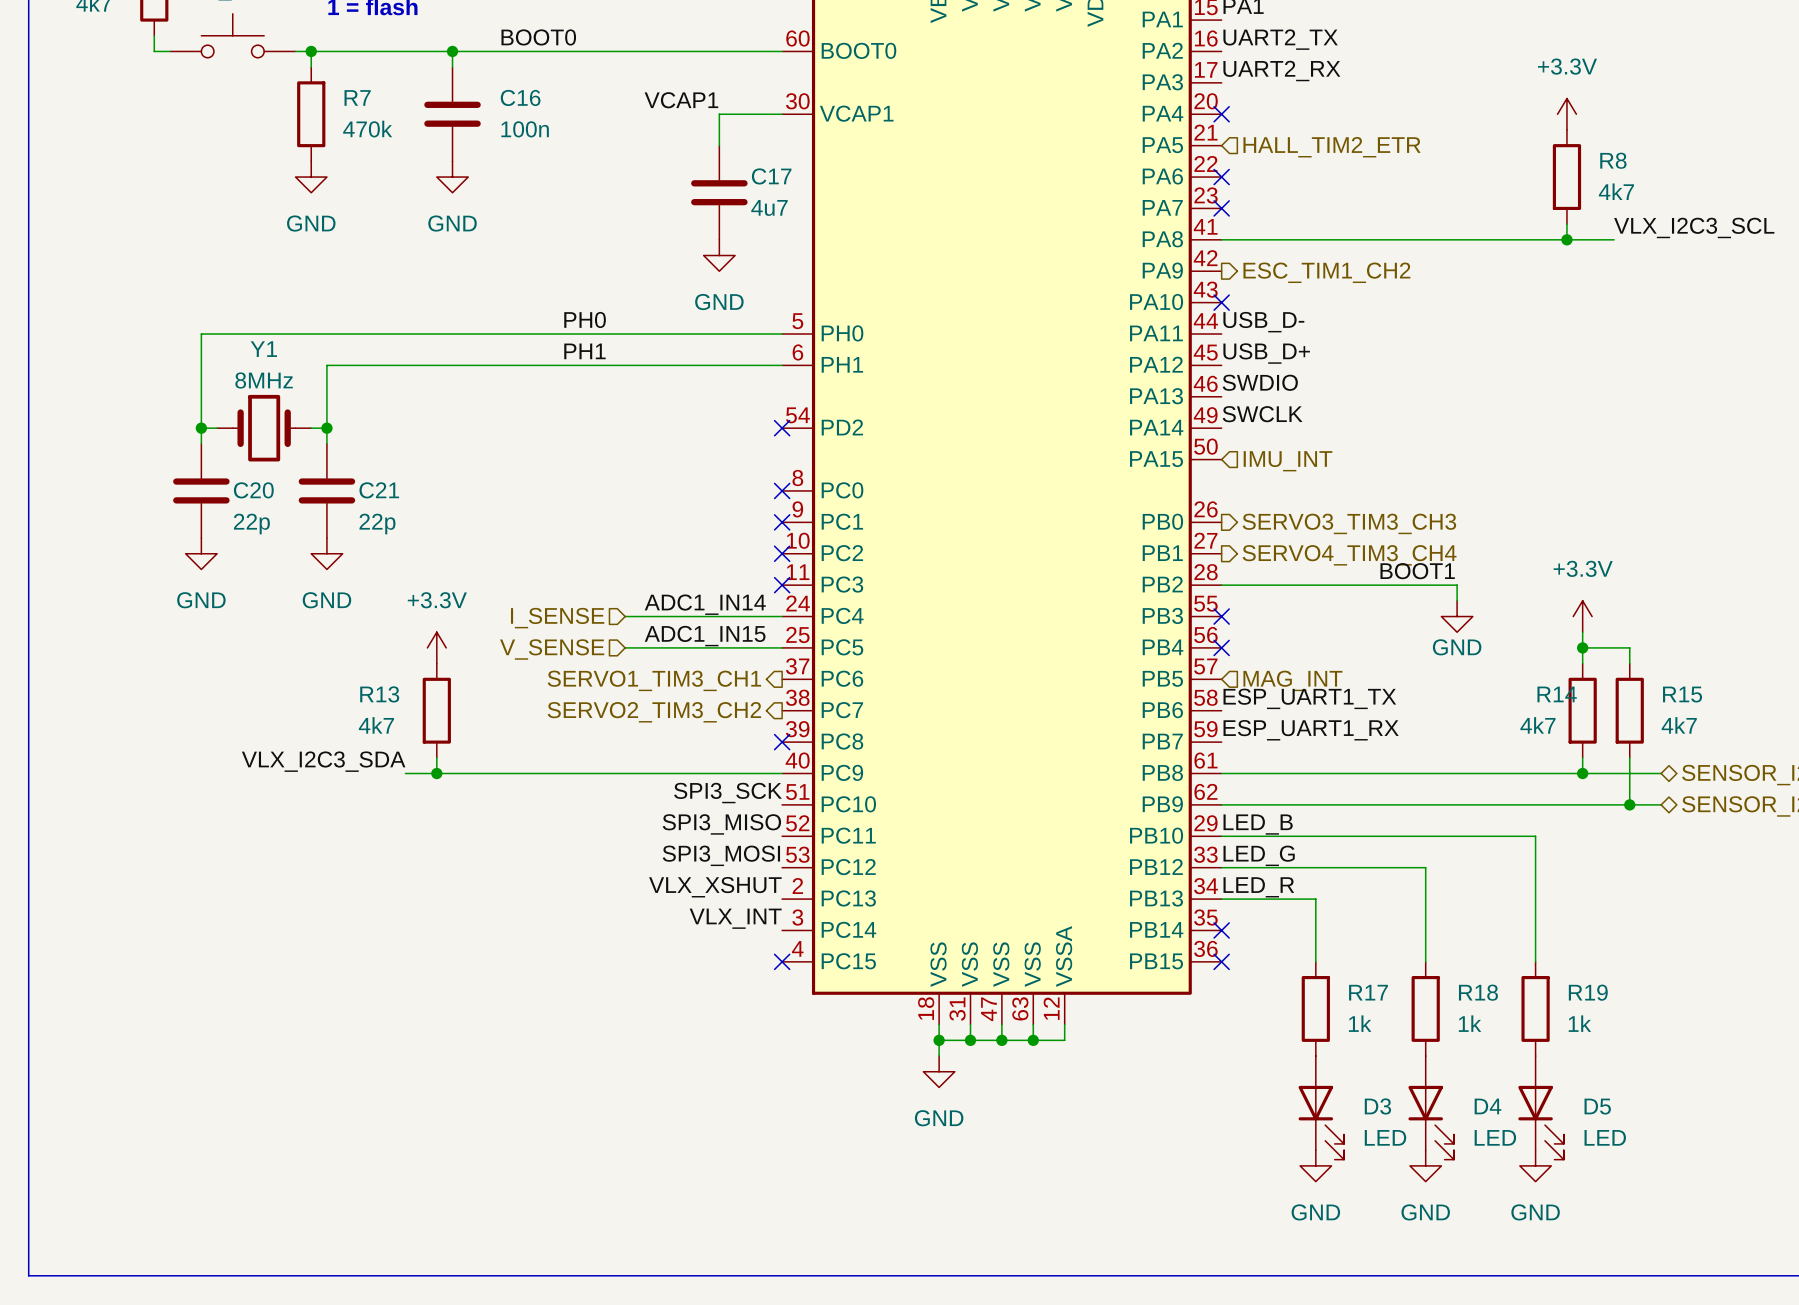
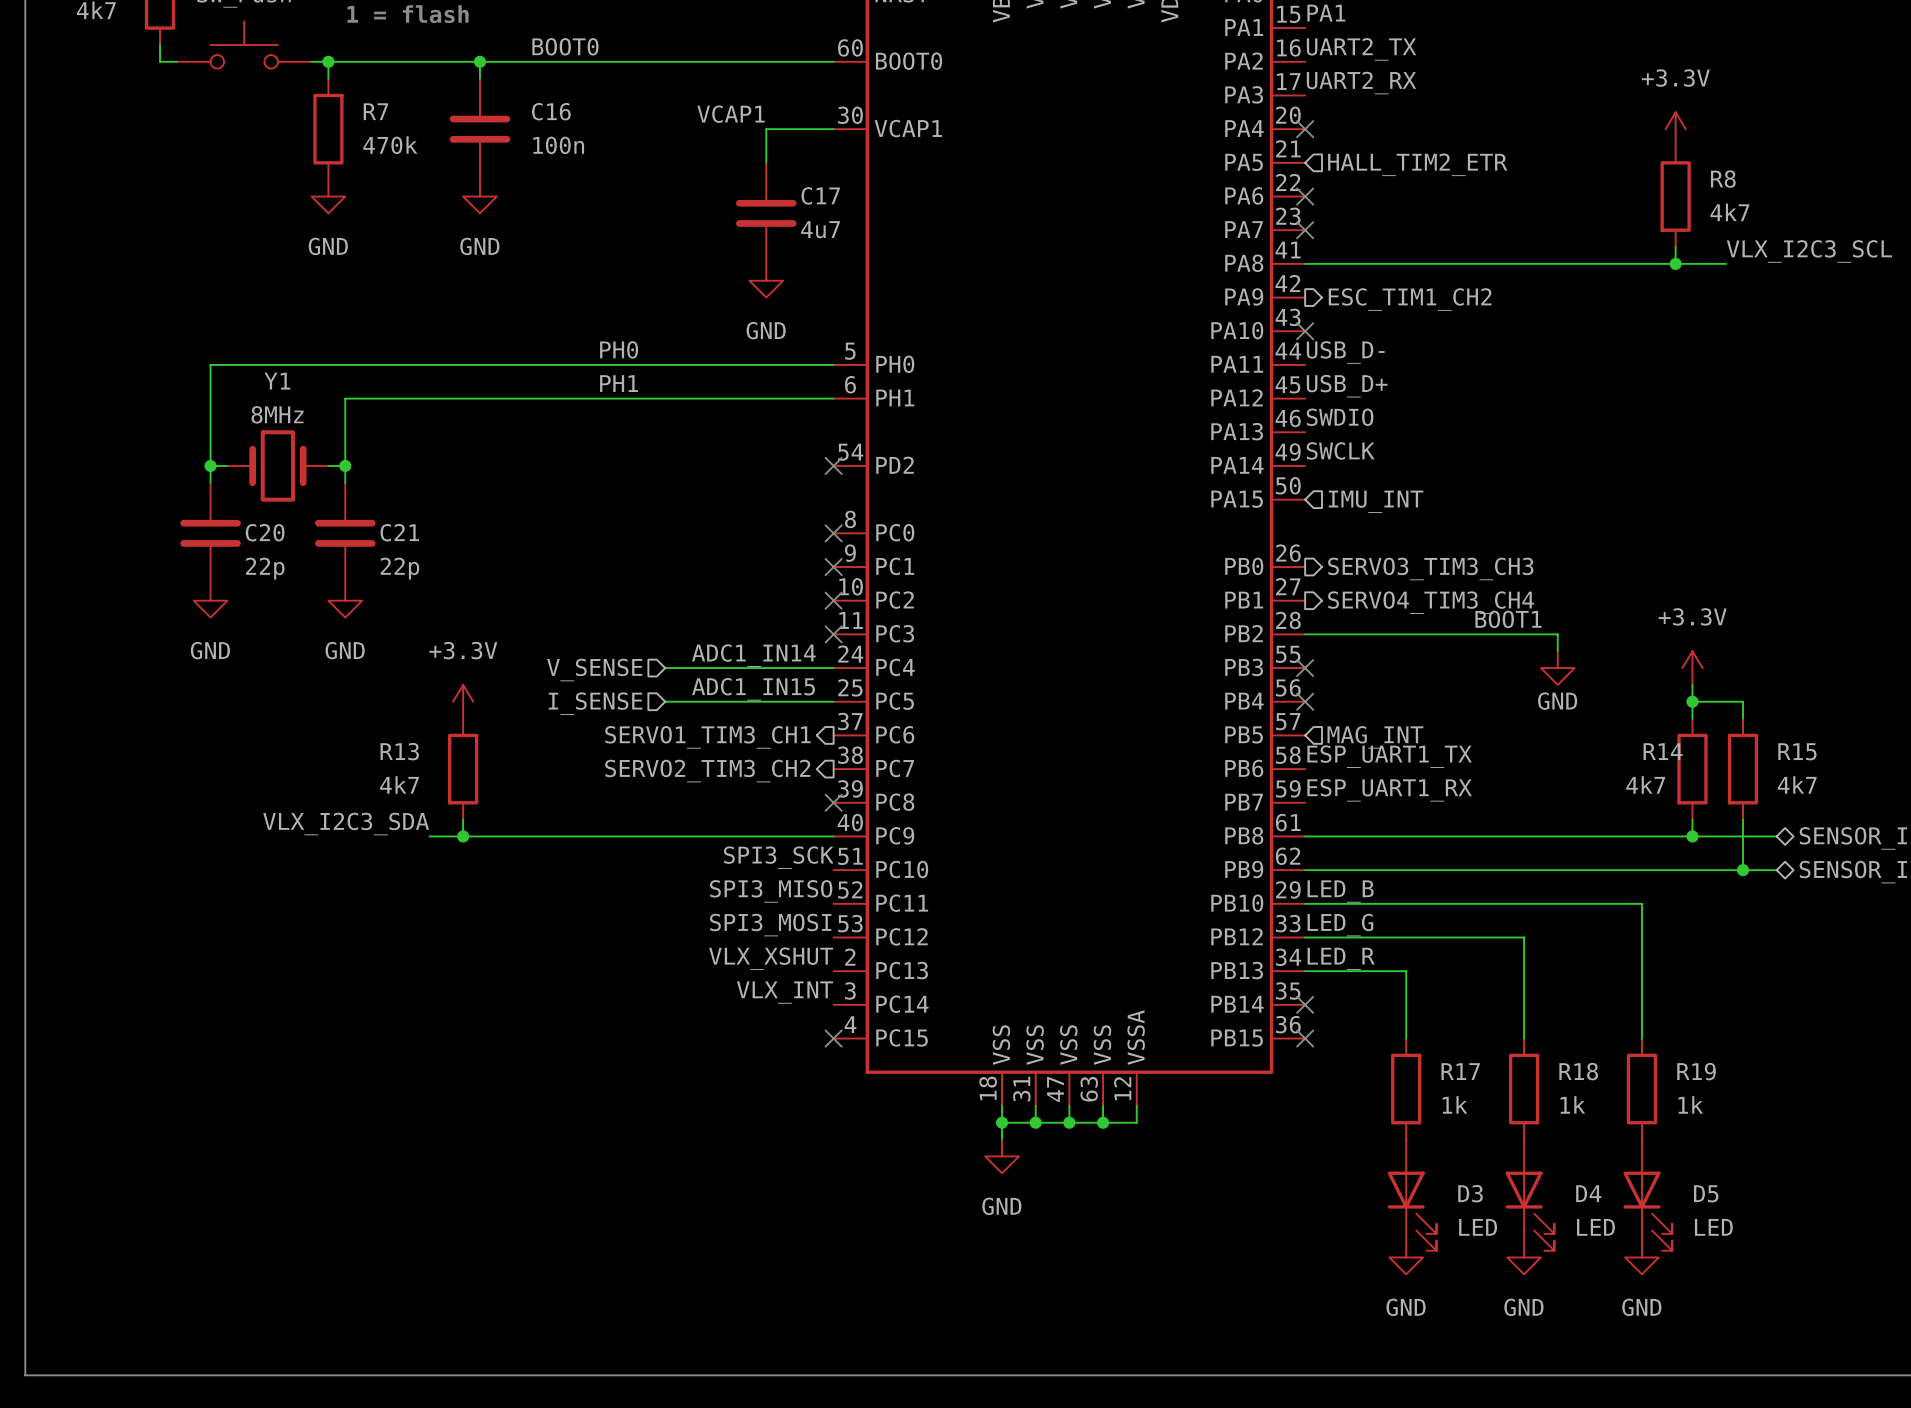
hierarchical label: I_SENSE (557, 618) -> V_SENSE (594, 670)
hierarchical label: V_SENSE (552, 649) -> I_SENSE (595, 703)

